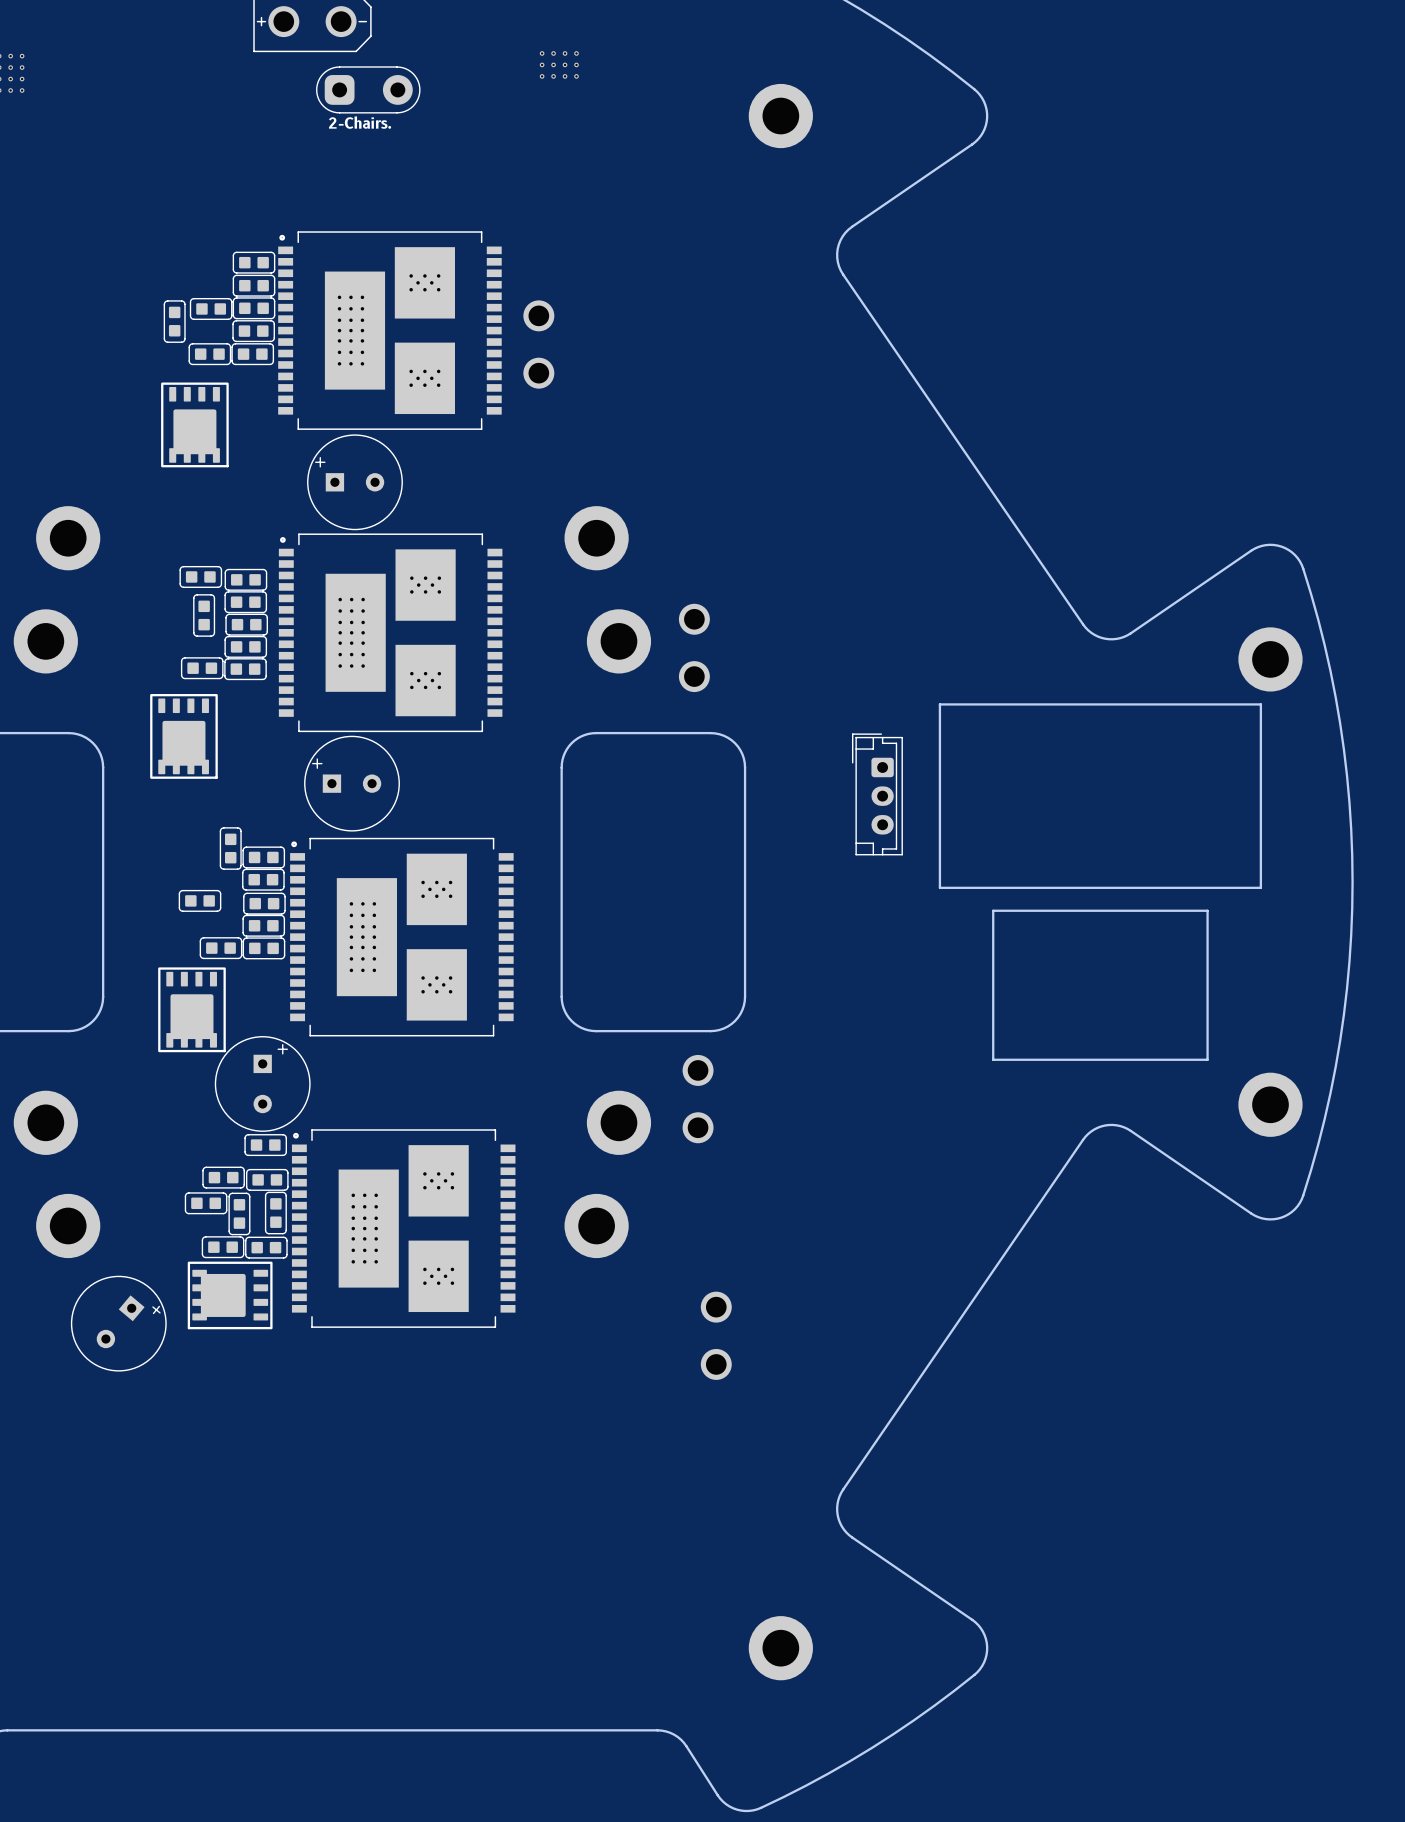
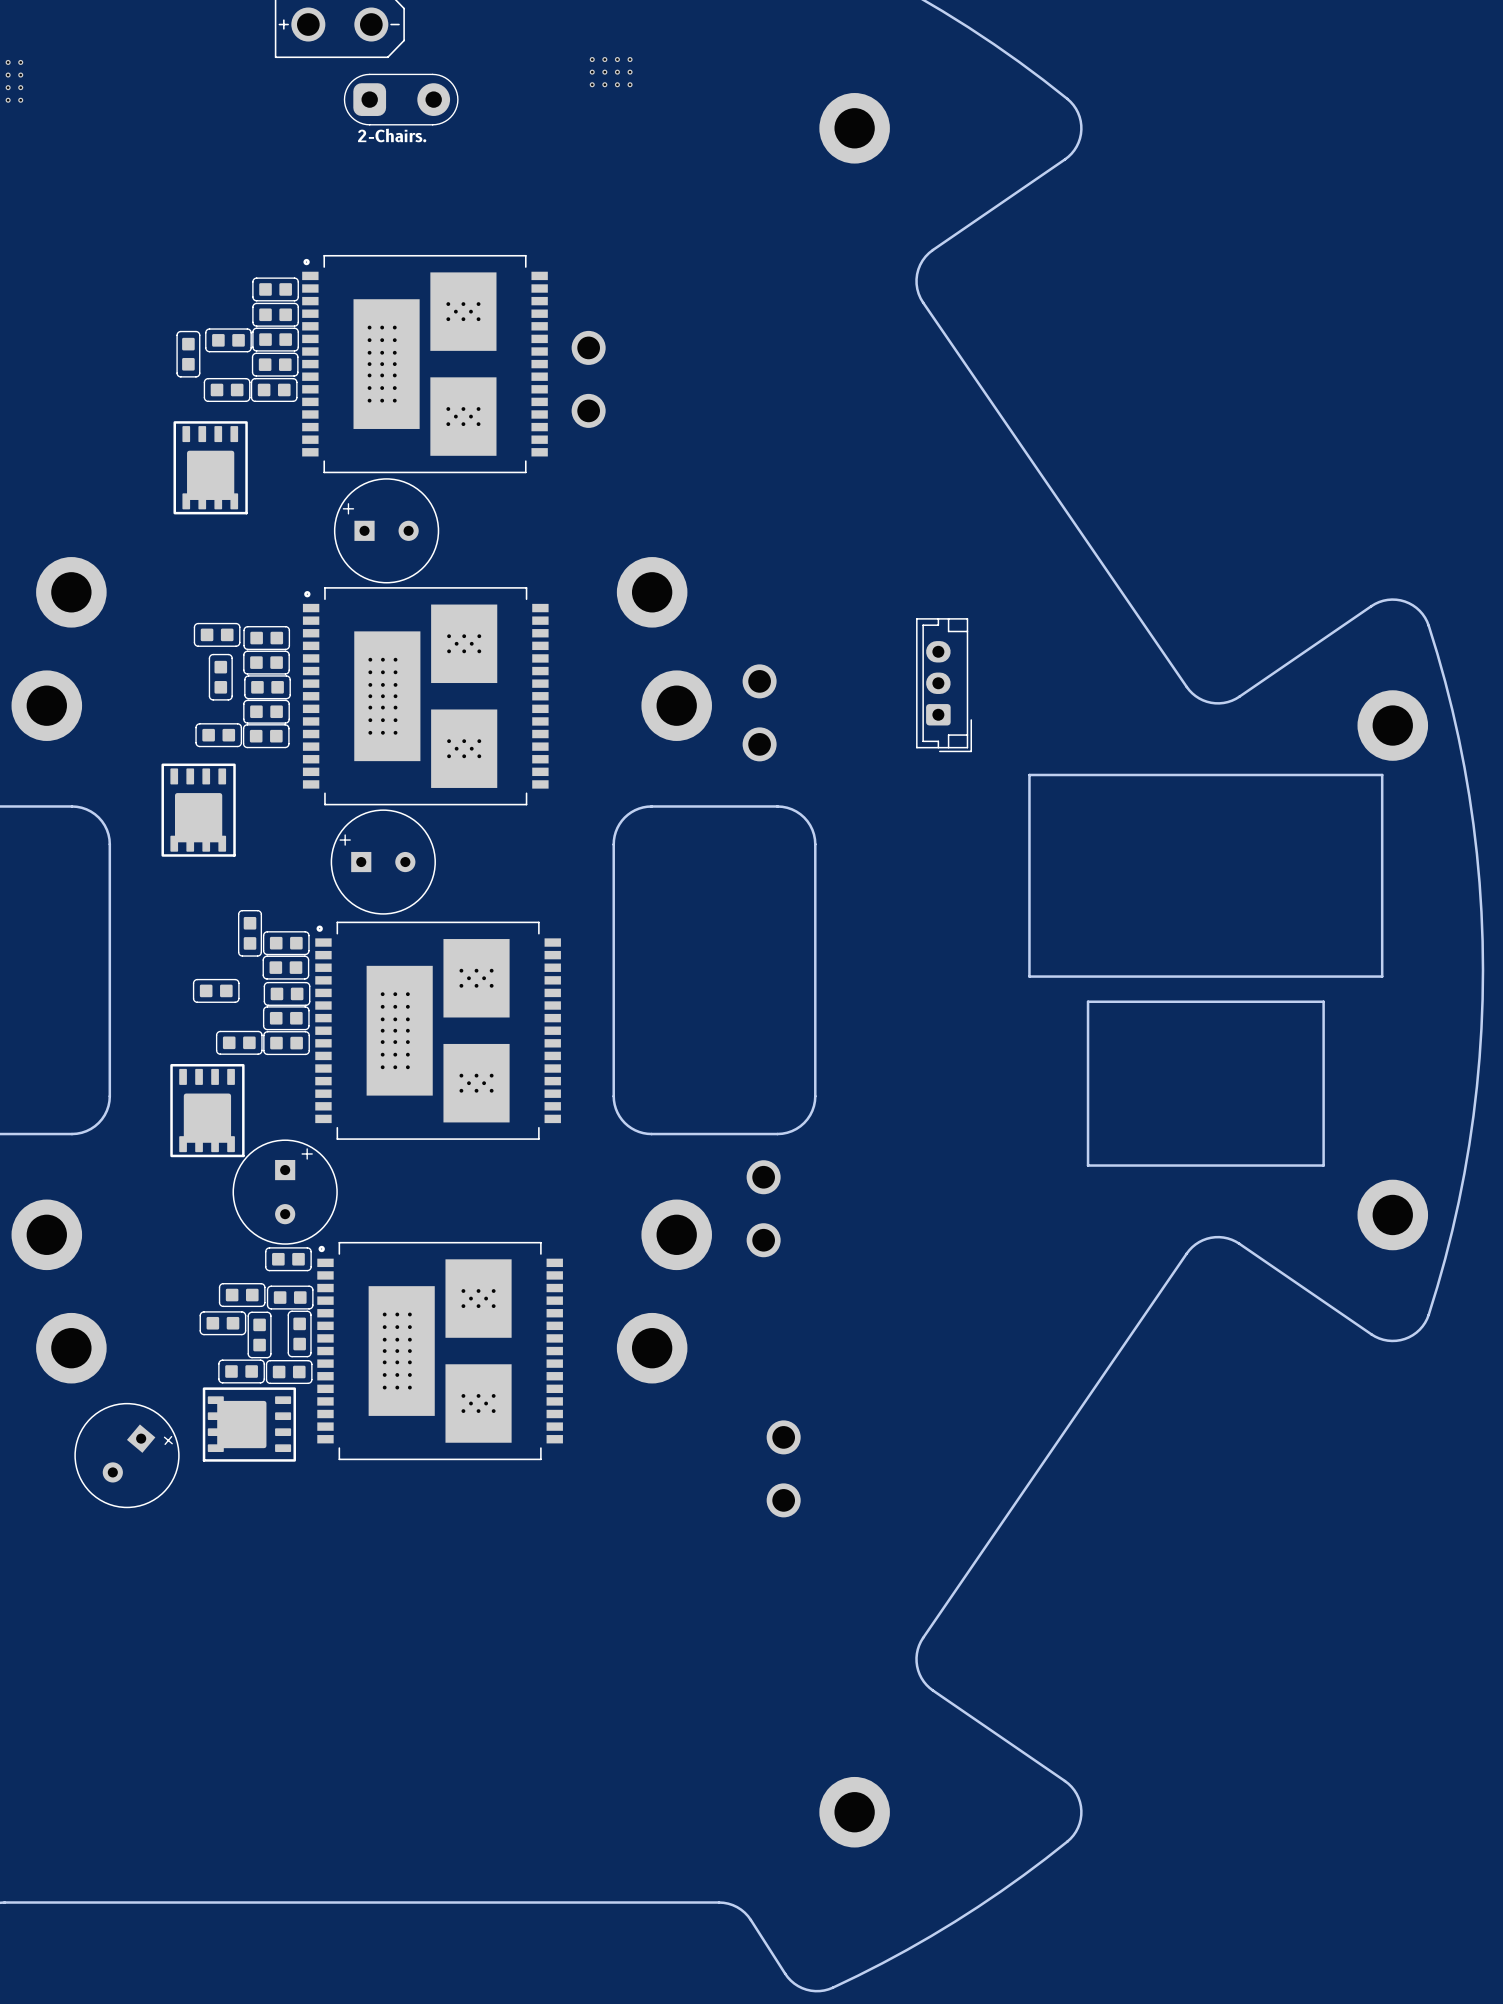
part rotation: 0° (877, 794) -> 180° (944, 685)
part position: (877, 794) -> (944, 685)

